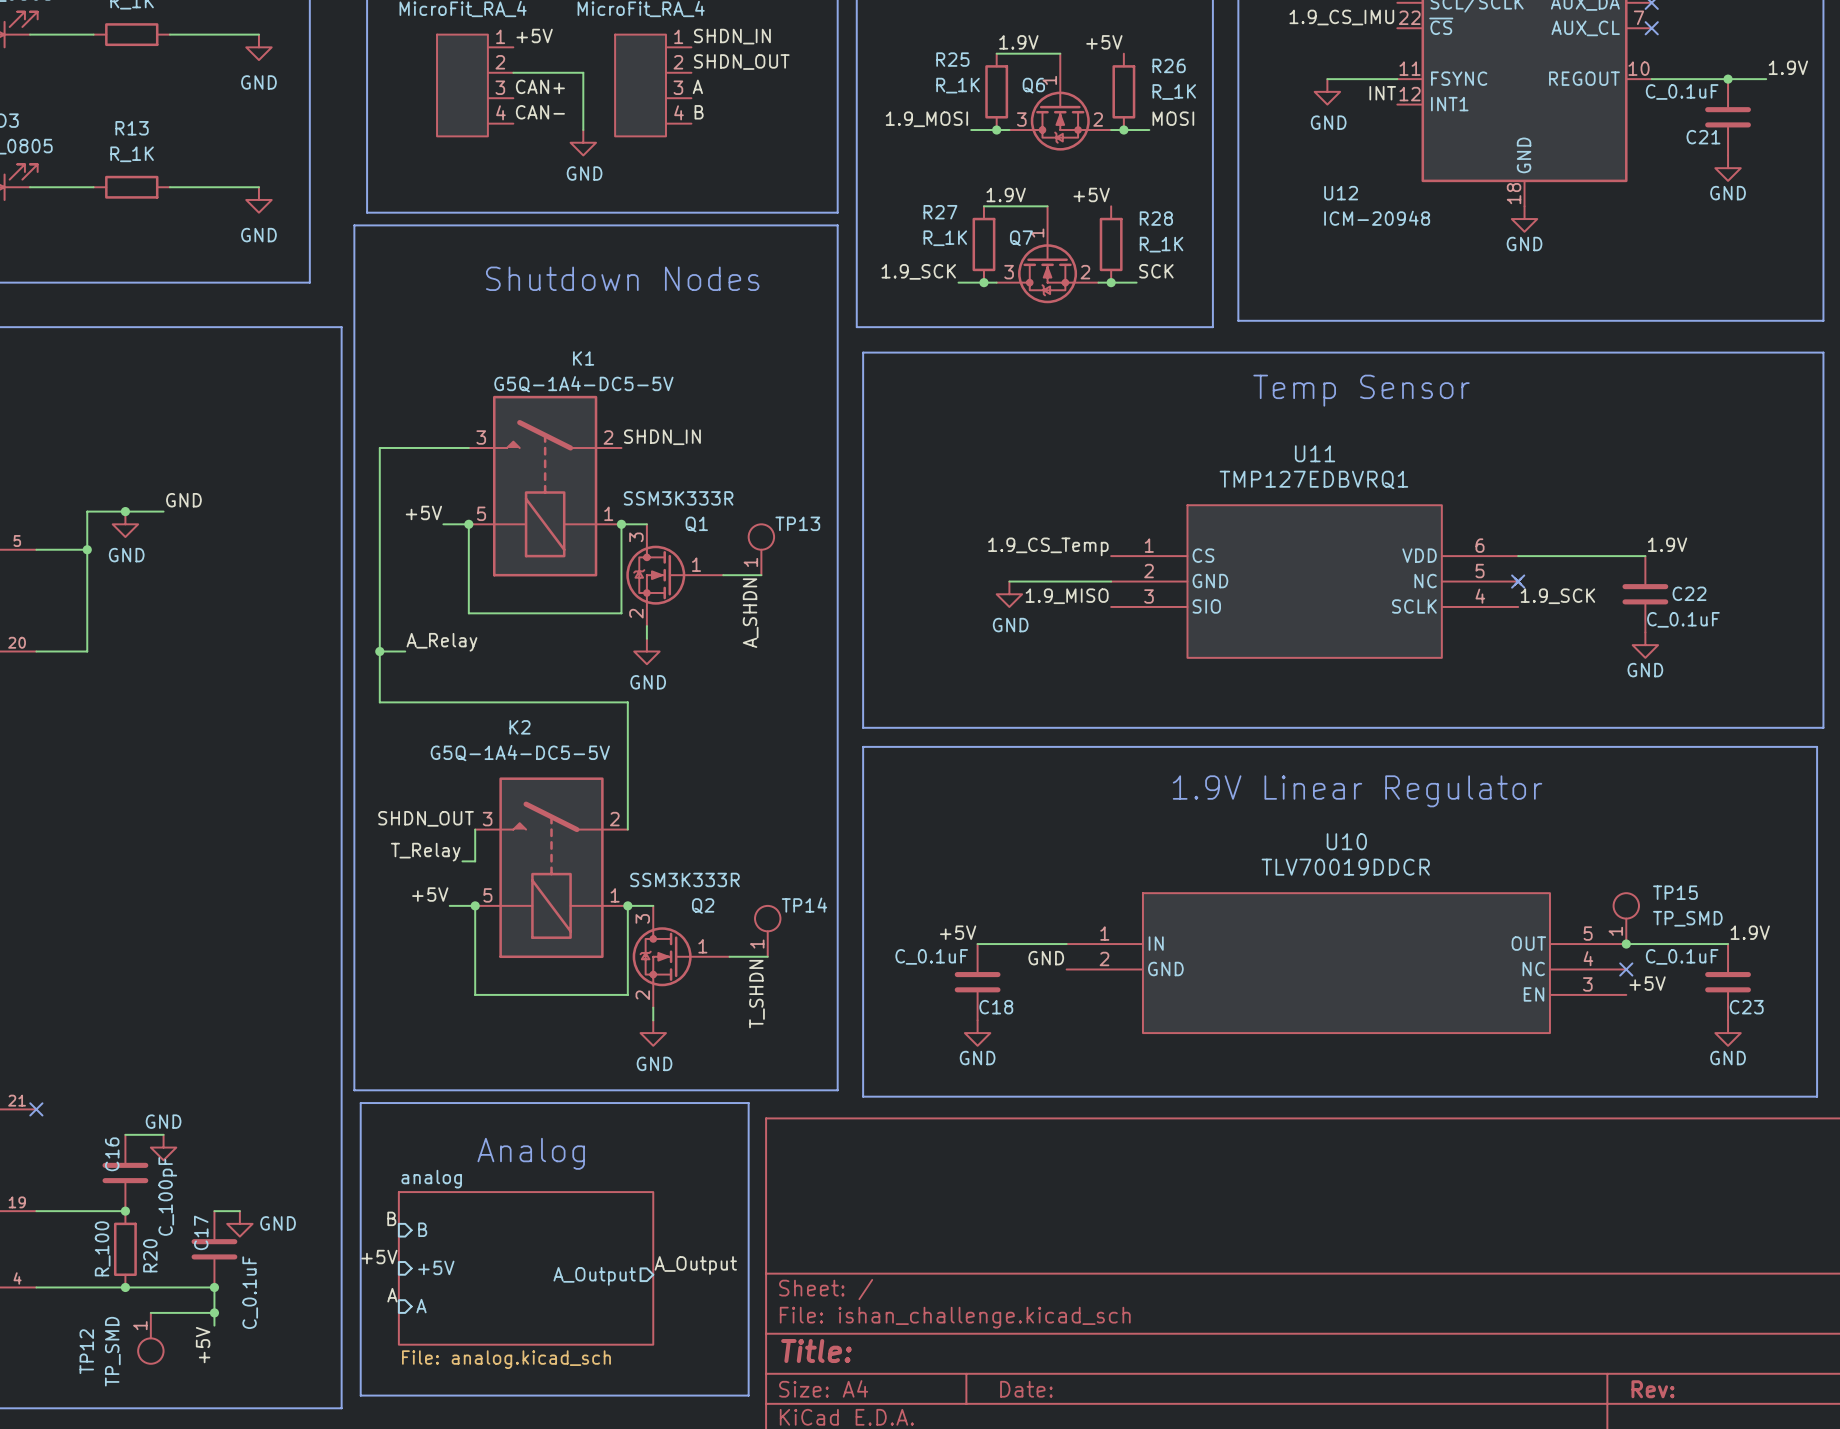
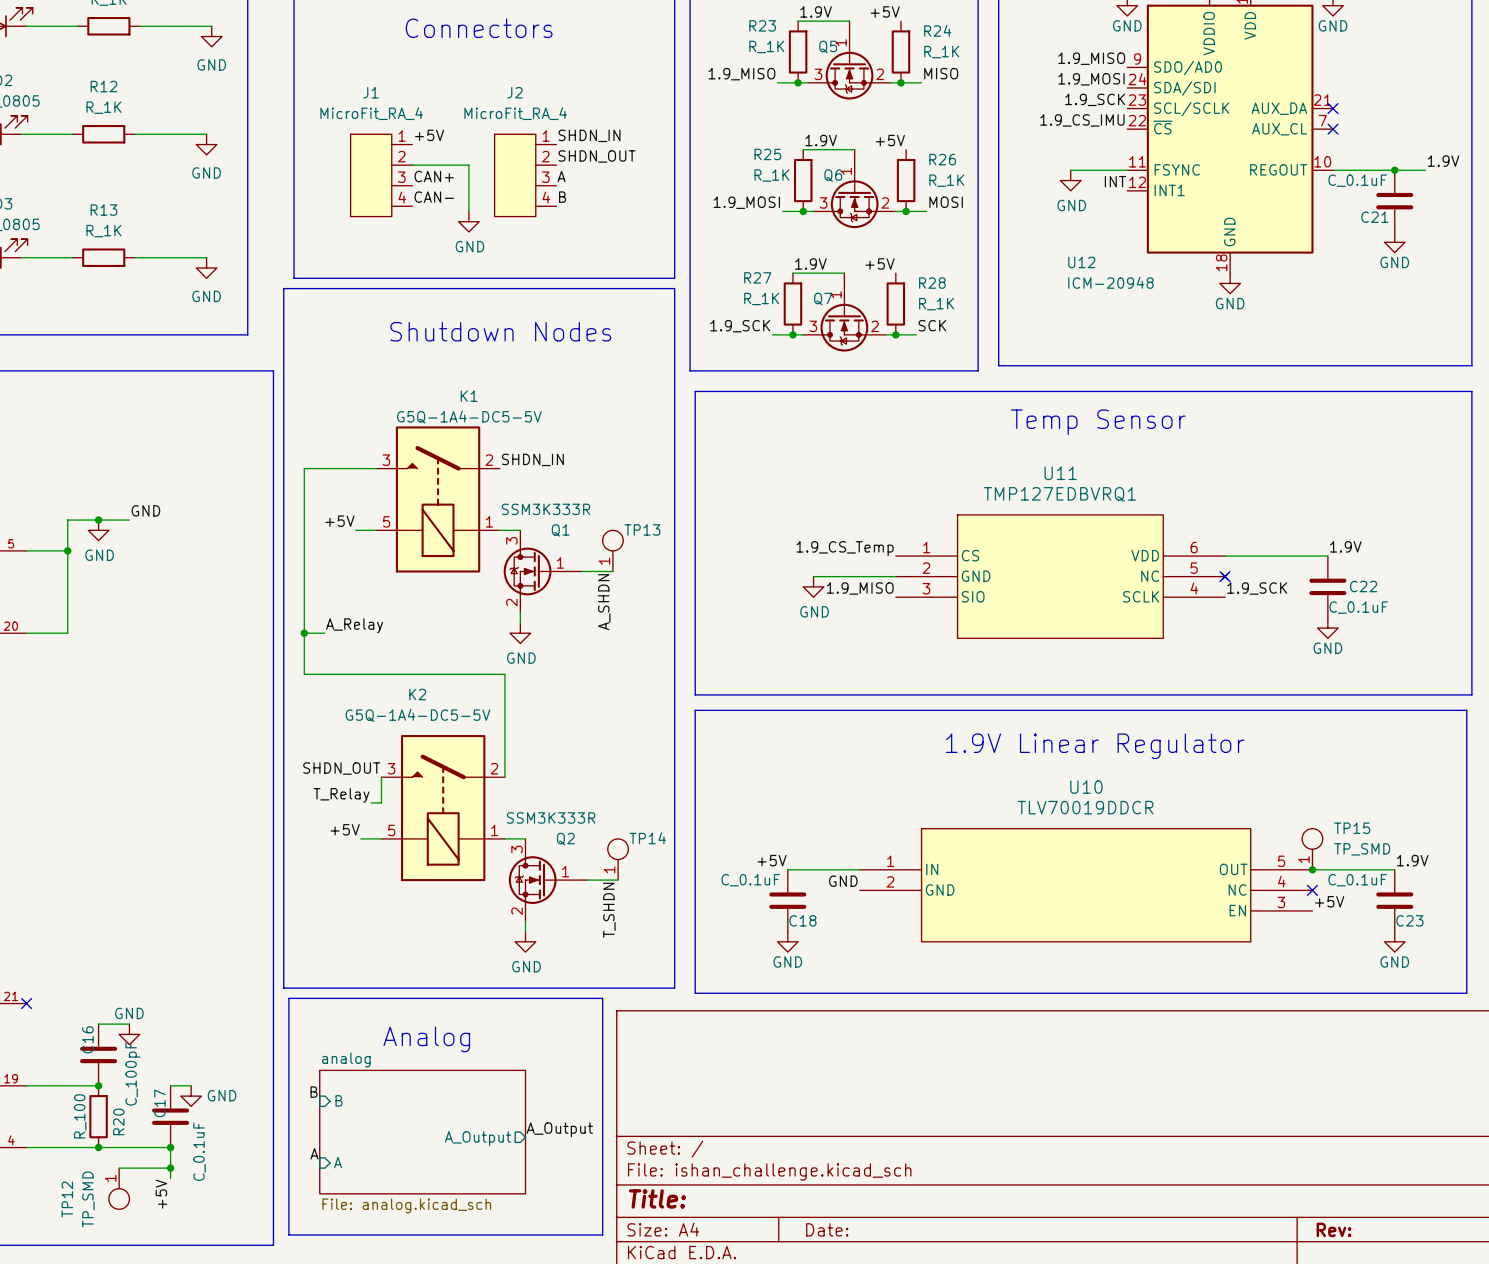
wire: (468, 524) (468, 613) (621, 613) (621, 524) -> none
junction: (468, 524) -> none
junction: (621, 524) -> none
wire: (475, 905) (475, 994) (627, 994) (627, 905) -> none
junction: (475, 905) -> none
junction: (627, 905) -> none
label: +5V (379, 1257) -> none
sheet pin: +5V (436, 1267) -> none

